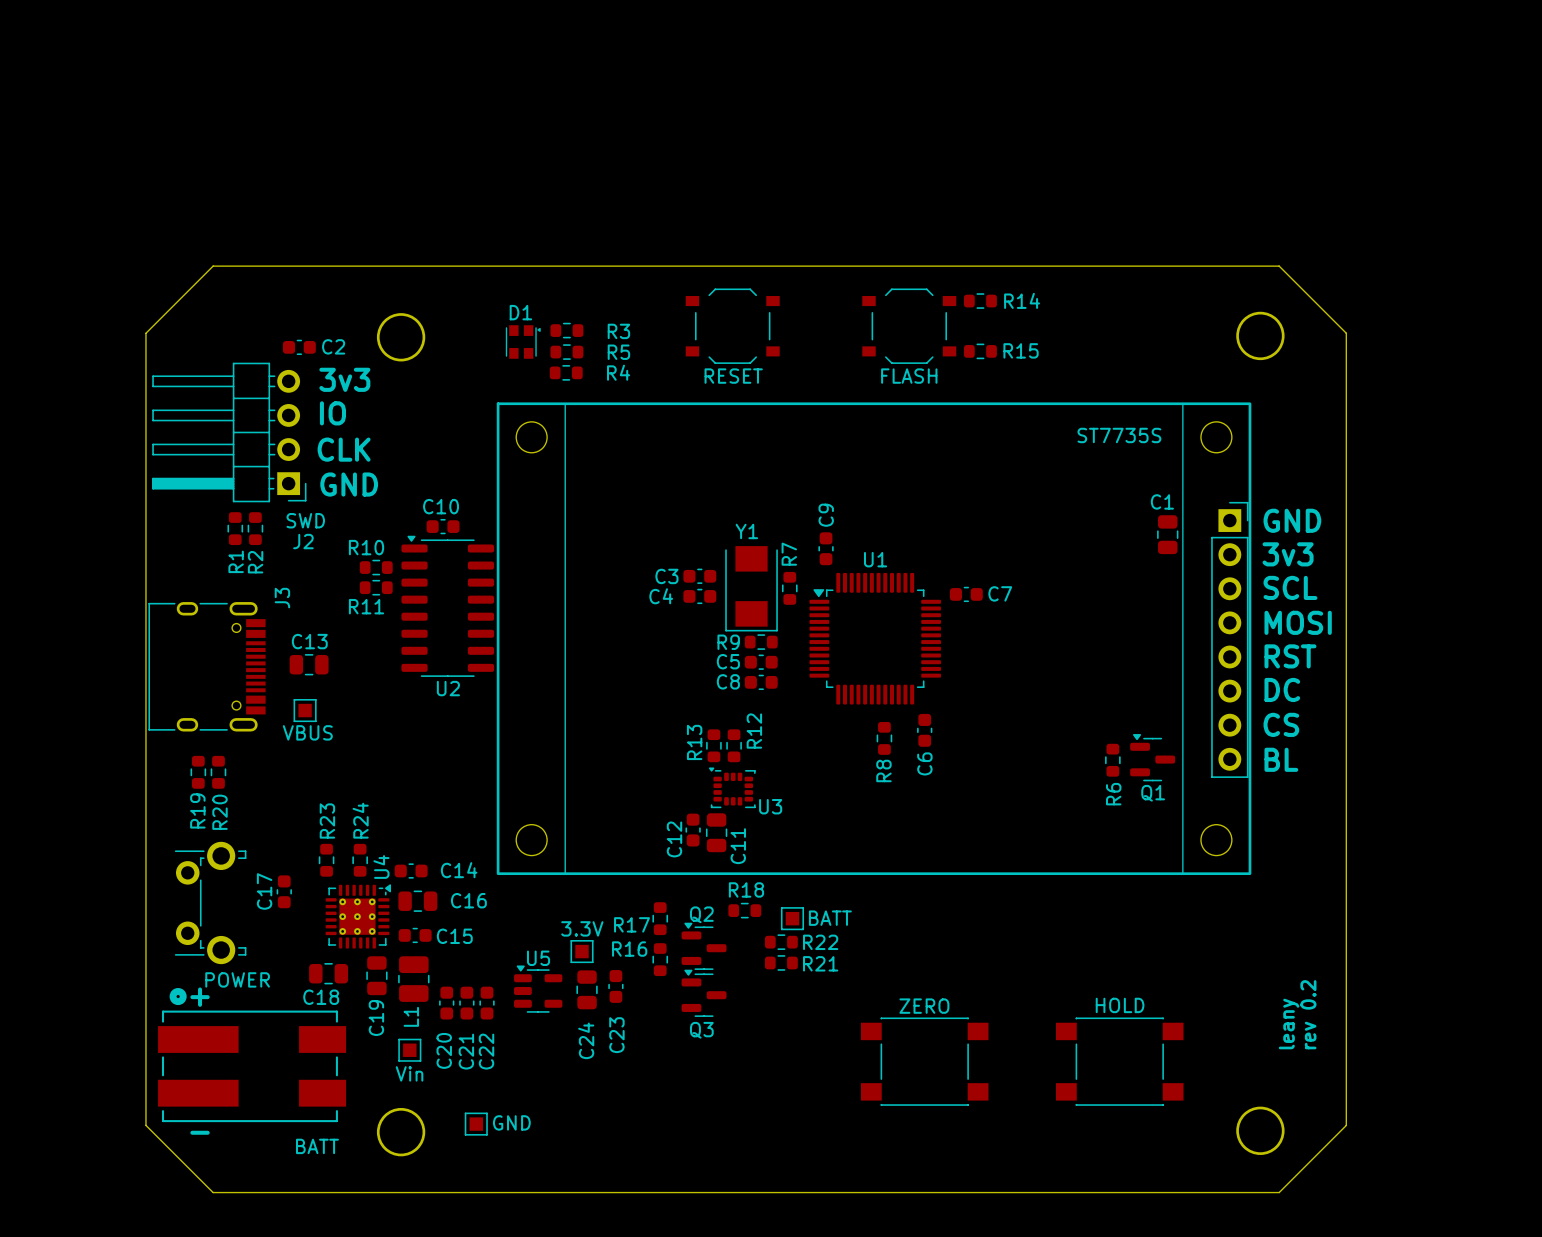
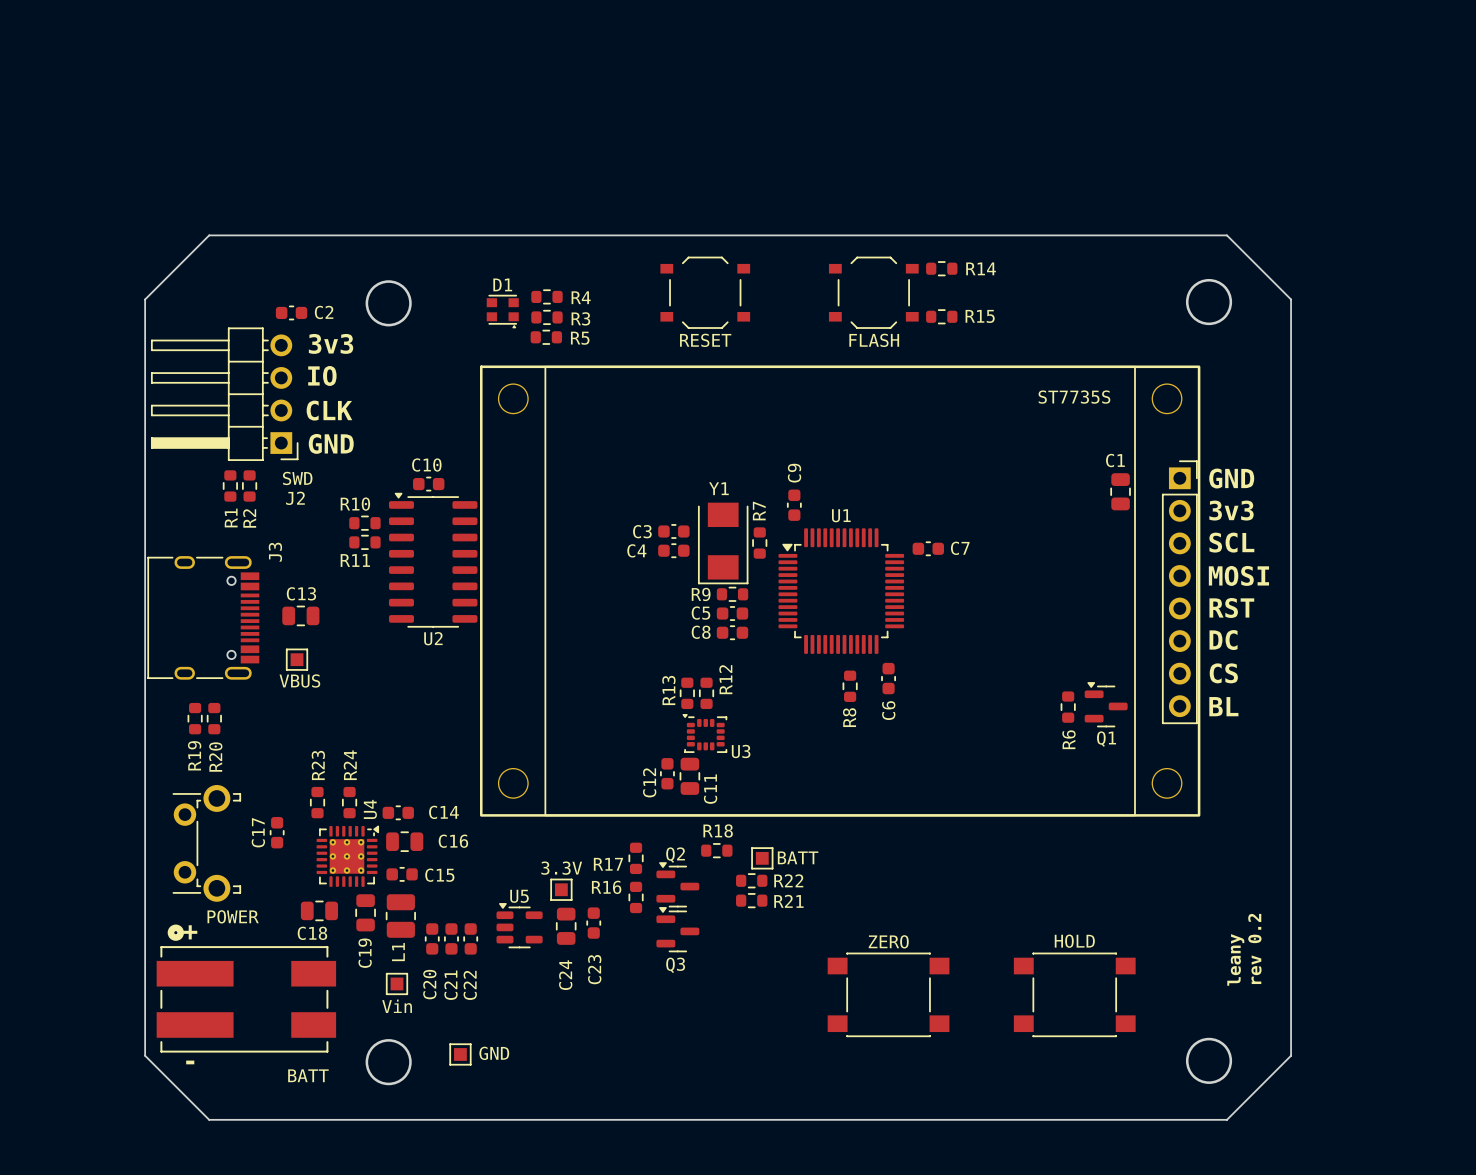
R3 name: R3 (618, 331) -> R4 (581, 297)
D1 rotation: 0° (523, 341) -> 90° clockwise (502, 311)
R5 name: R5 (618, 352) -> R3 (580, 318)
R4 name: R4 (618, 372) -> R5 (580, 338)

